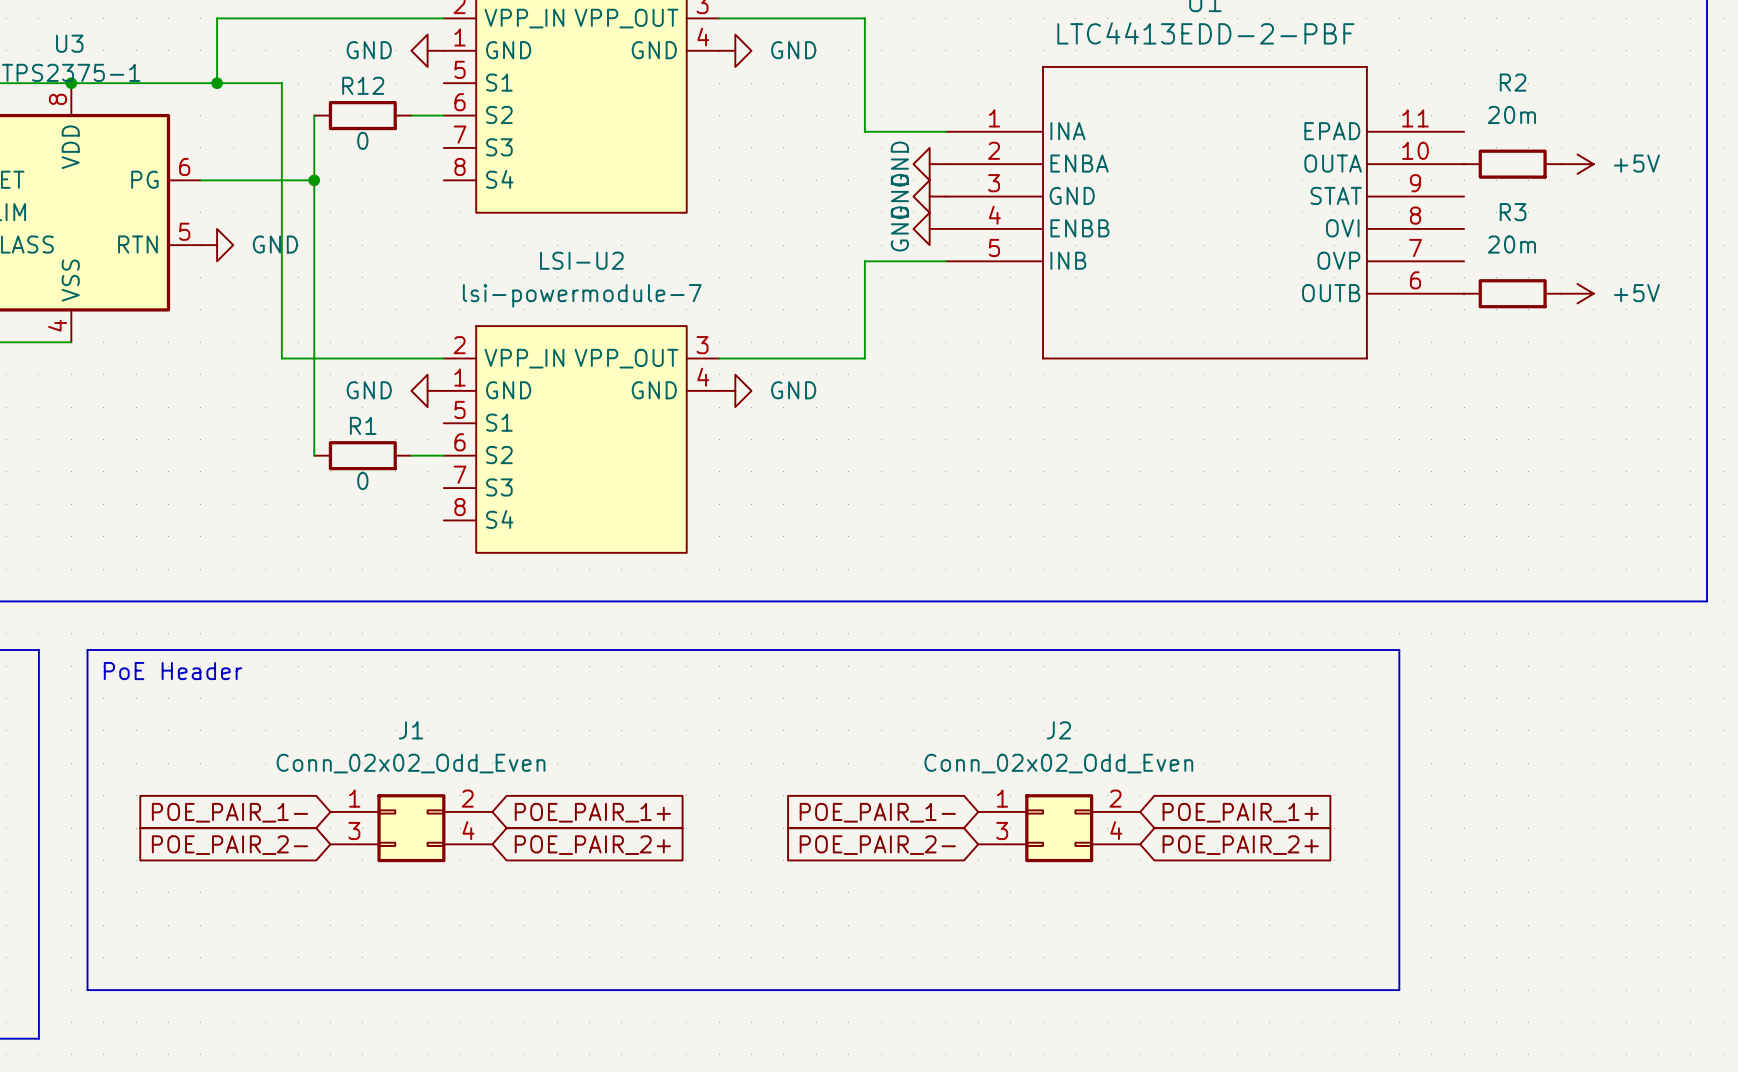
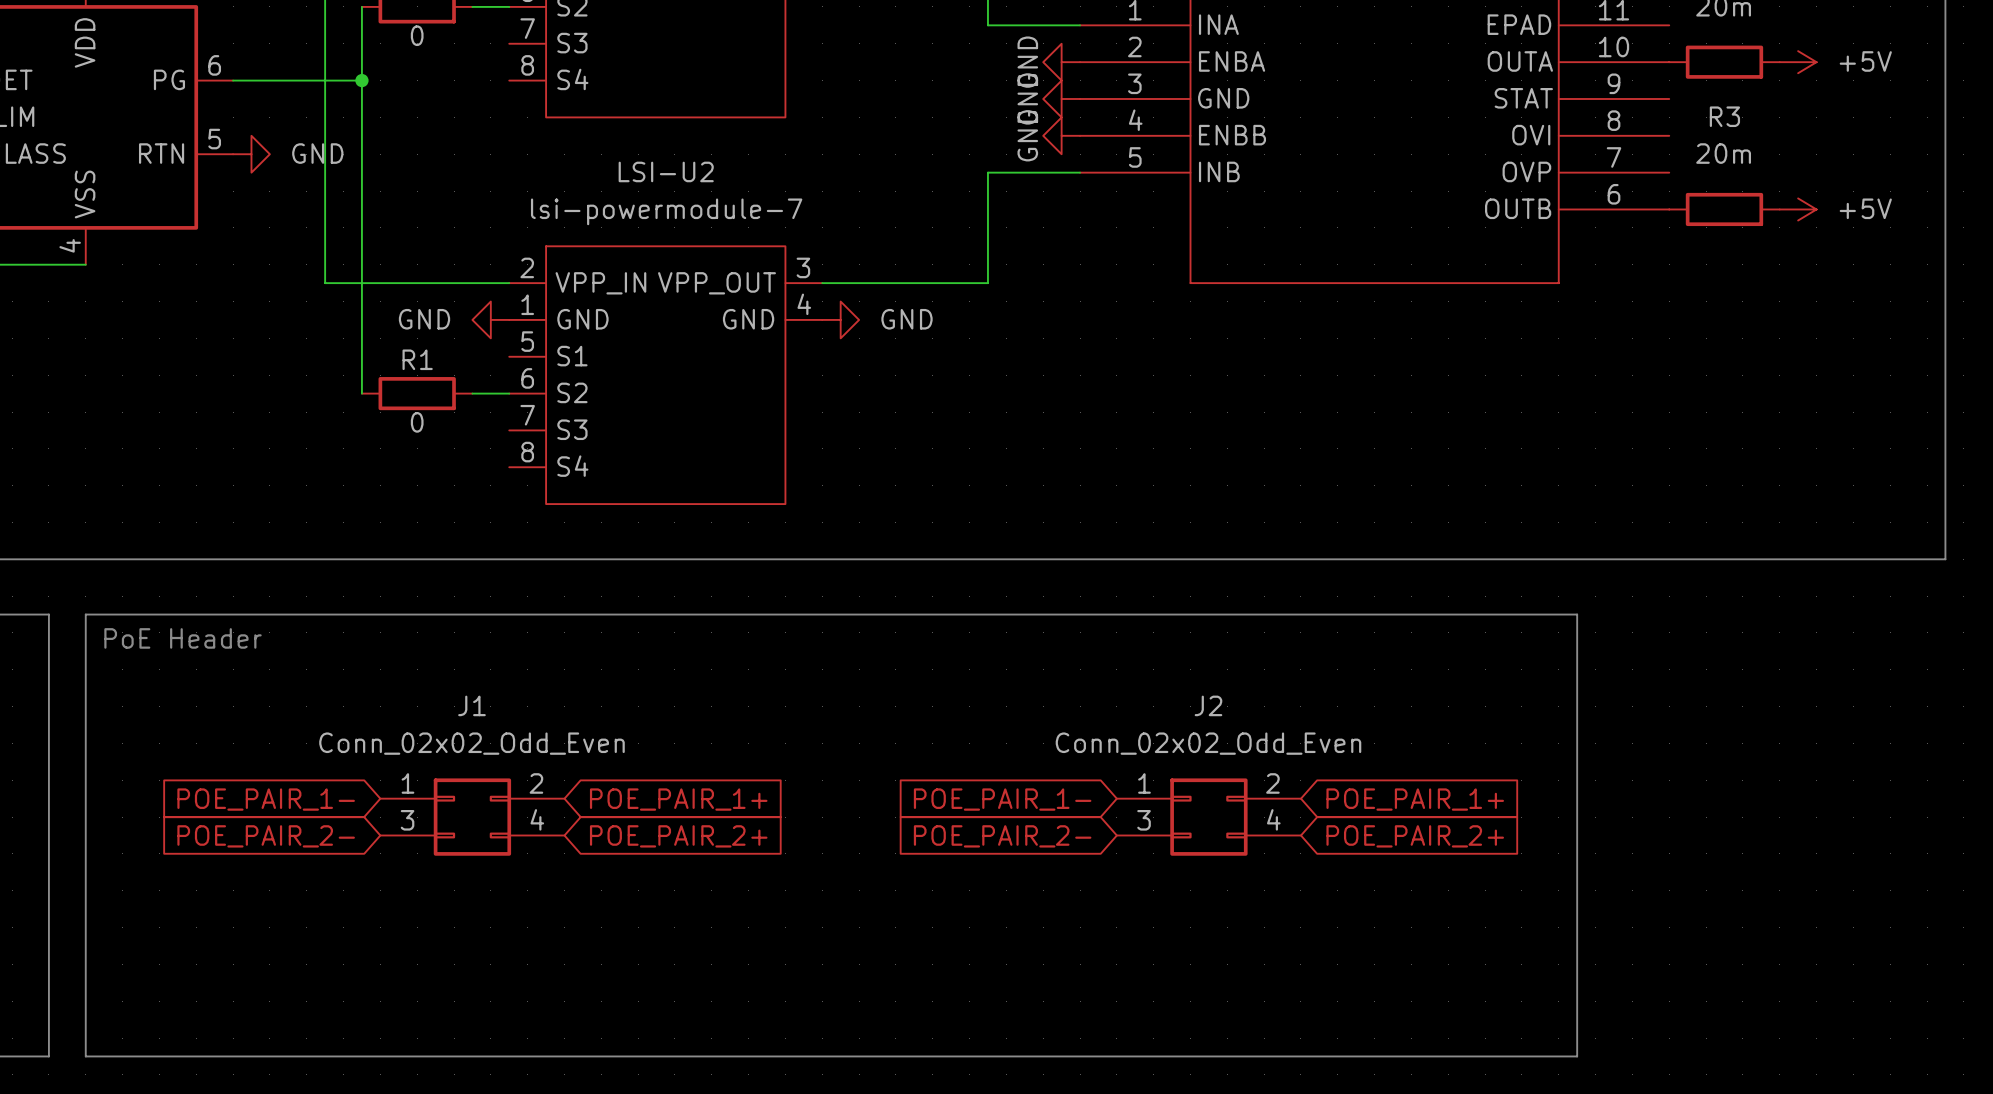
line: (87, 650) (87, 990) (1399, 990) (1399, 650) (1383, 650) -> (104, 614) (85, 614) (85, 1056) (1577, 1056) (1577, 614)
text position: PoE Header (173, 671) -> PoE Header (183, 638)

